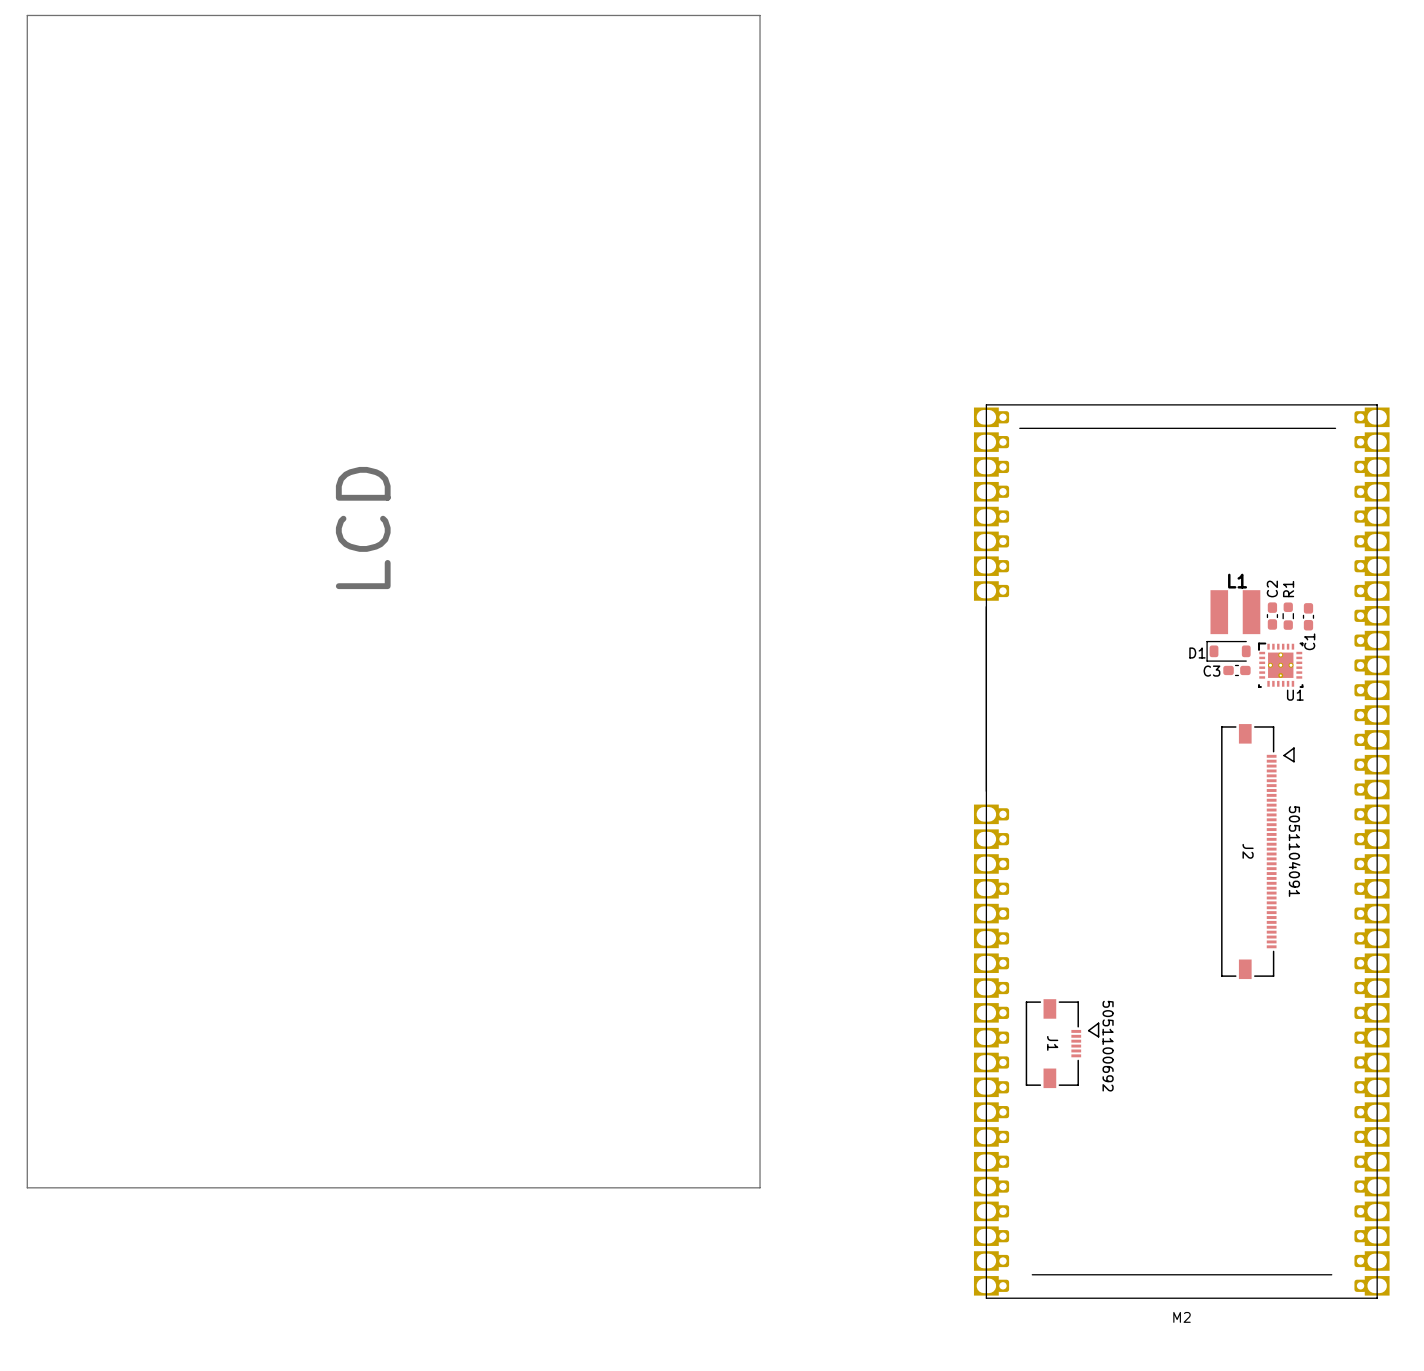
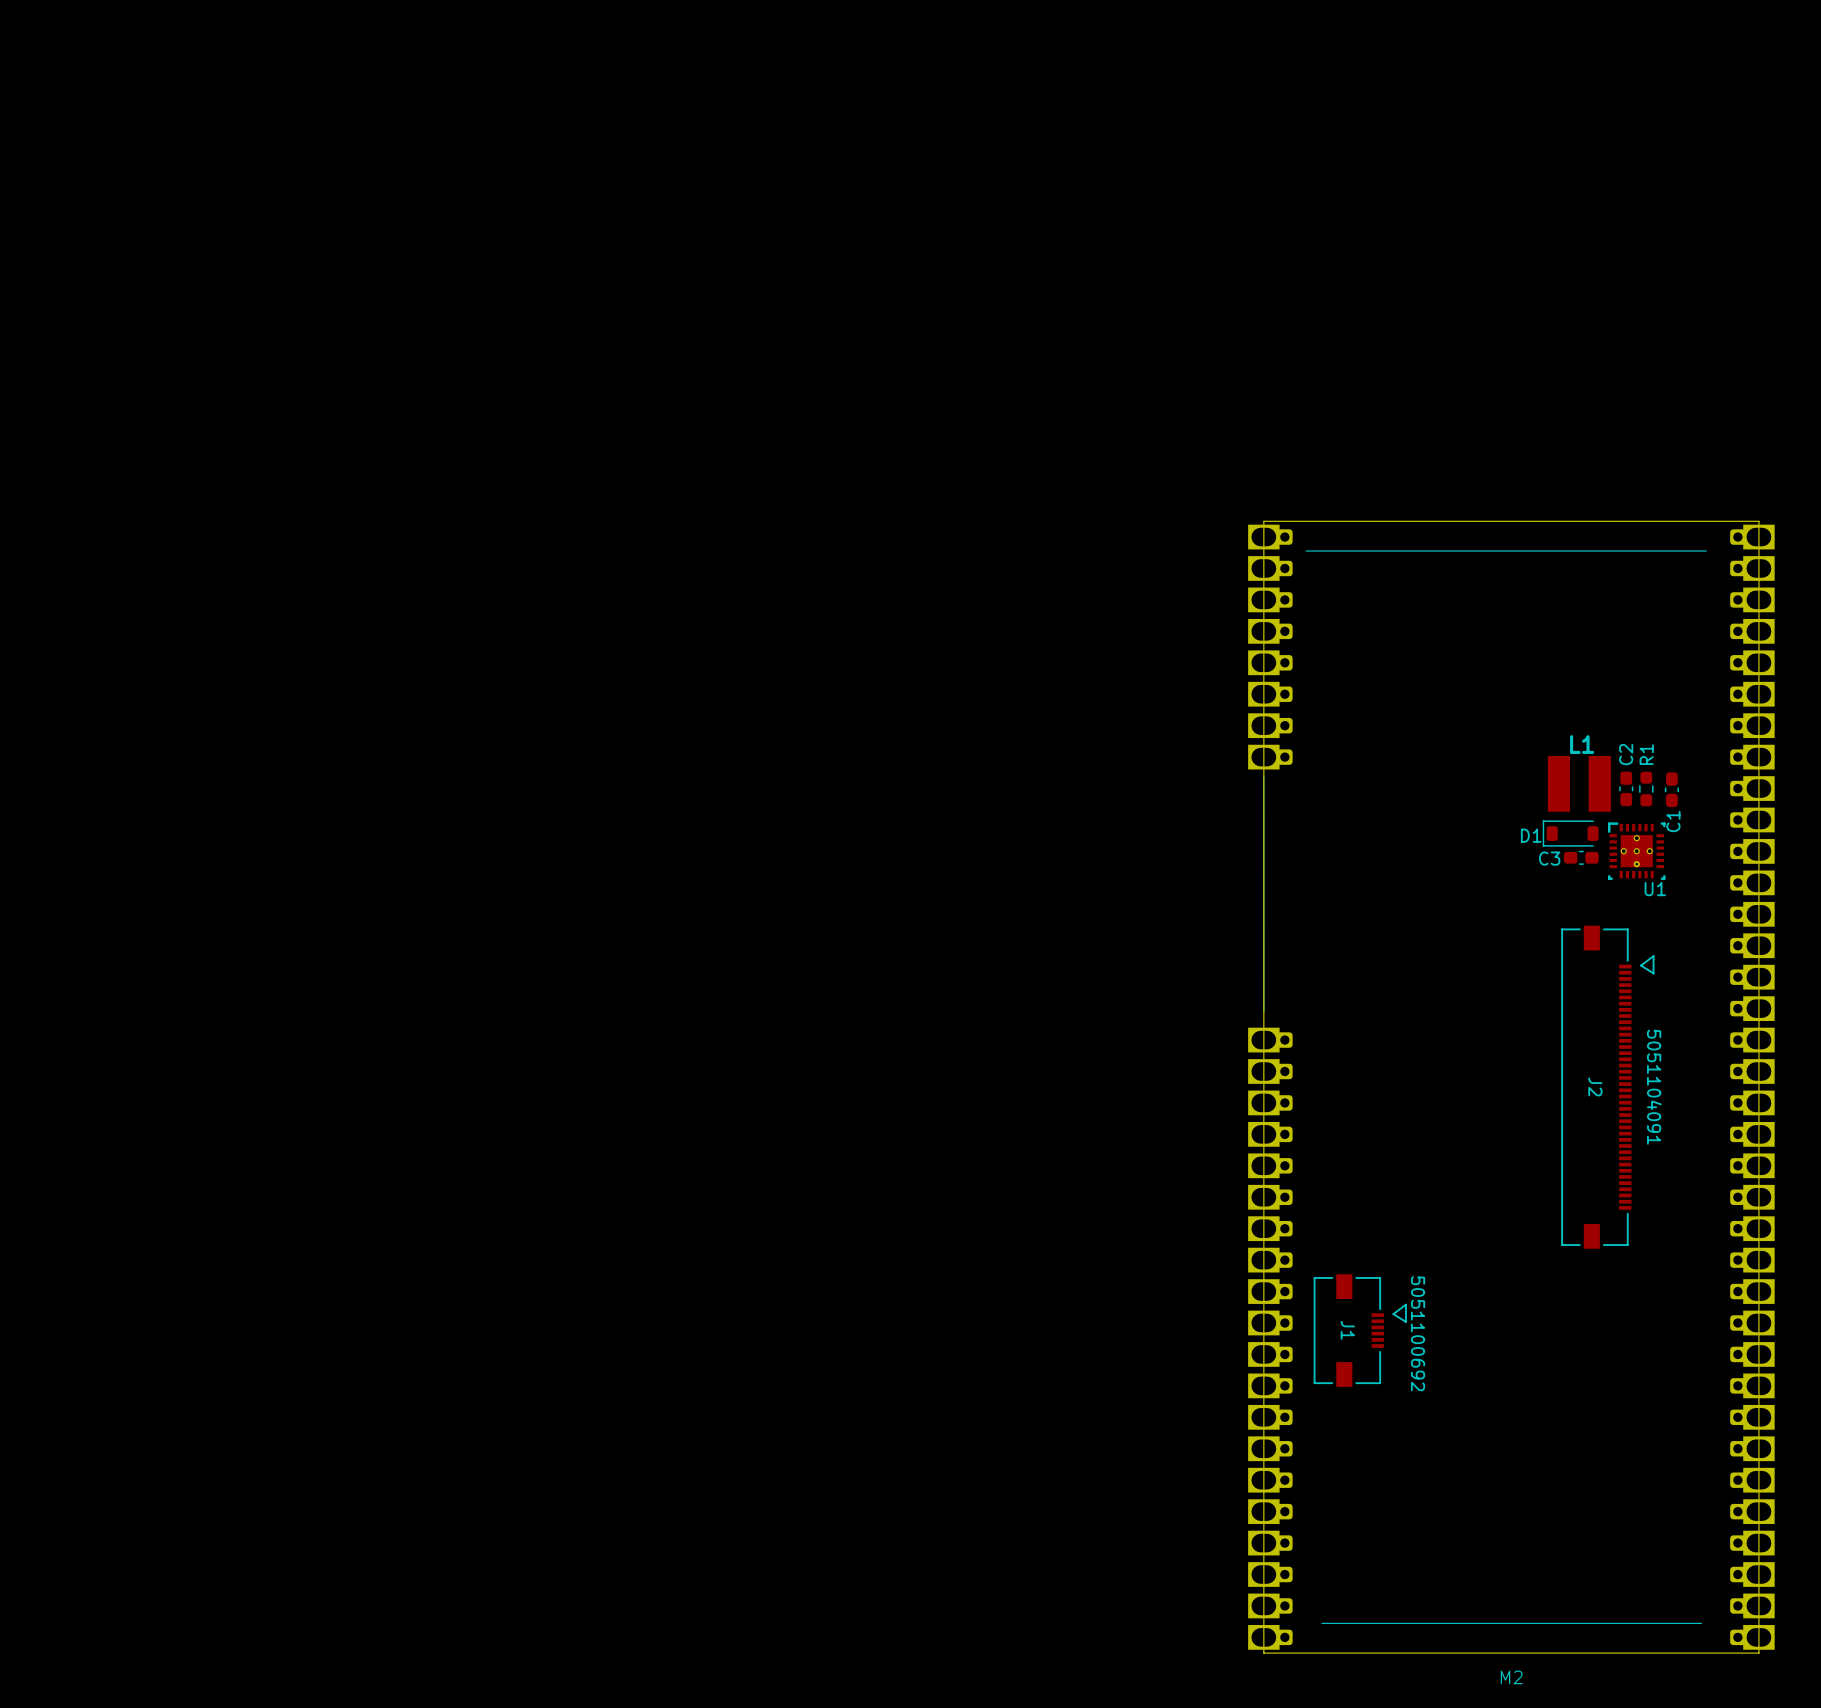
line: (27, 15) (760, 15) (760, 1187) (27, 1187) (27, 15) -> none
text: LCD (363, 528) -> none

